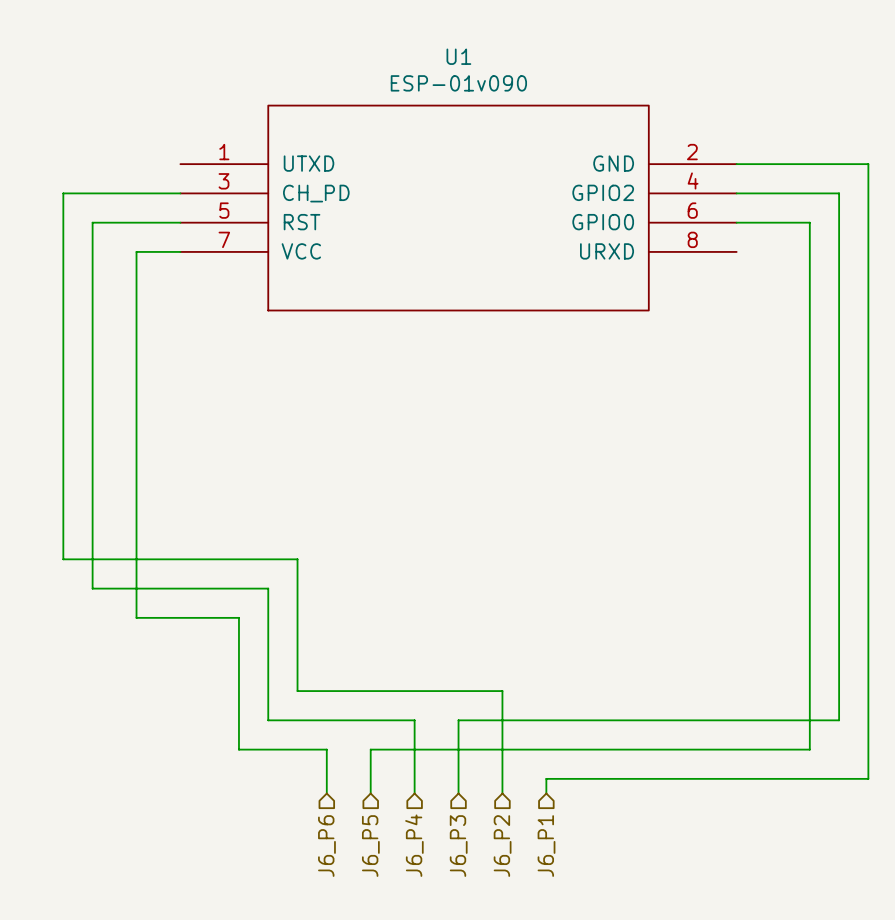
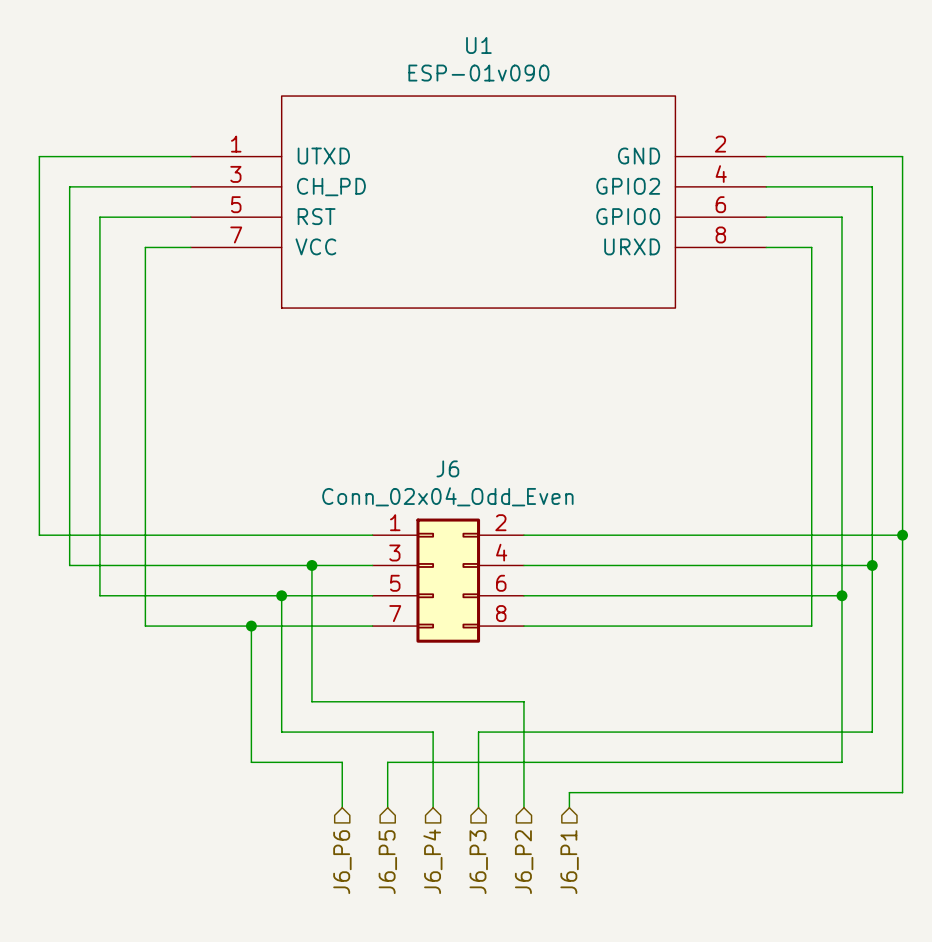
wire: none -> (190, 156) (39, 156) (39, 535) (372, 535)
wire: none -> (766, 247) (811, 247) (811, 626) (523, 626)
wire: none -> (523, 535) (902, 535)
junction: none -> (902, 535)
wire: none -> (311, 565) (372, 565)
junction: none -> (311, 565)
wire: none -> (523, 565) (872, 565)
junction: none -> (872, 565)
J6: none -> Conn_02x04_Odd_Even (448, 580)
wire: none -> (281, 595) (372, 595)
junction: none -> (281, 595)
wire: none -> (523, 595) (841, 595)
junction: none -> (841, 595)
wire: none -> (251, 626) (372, 626)
junction: none -> (251, 626)

